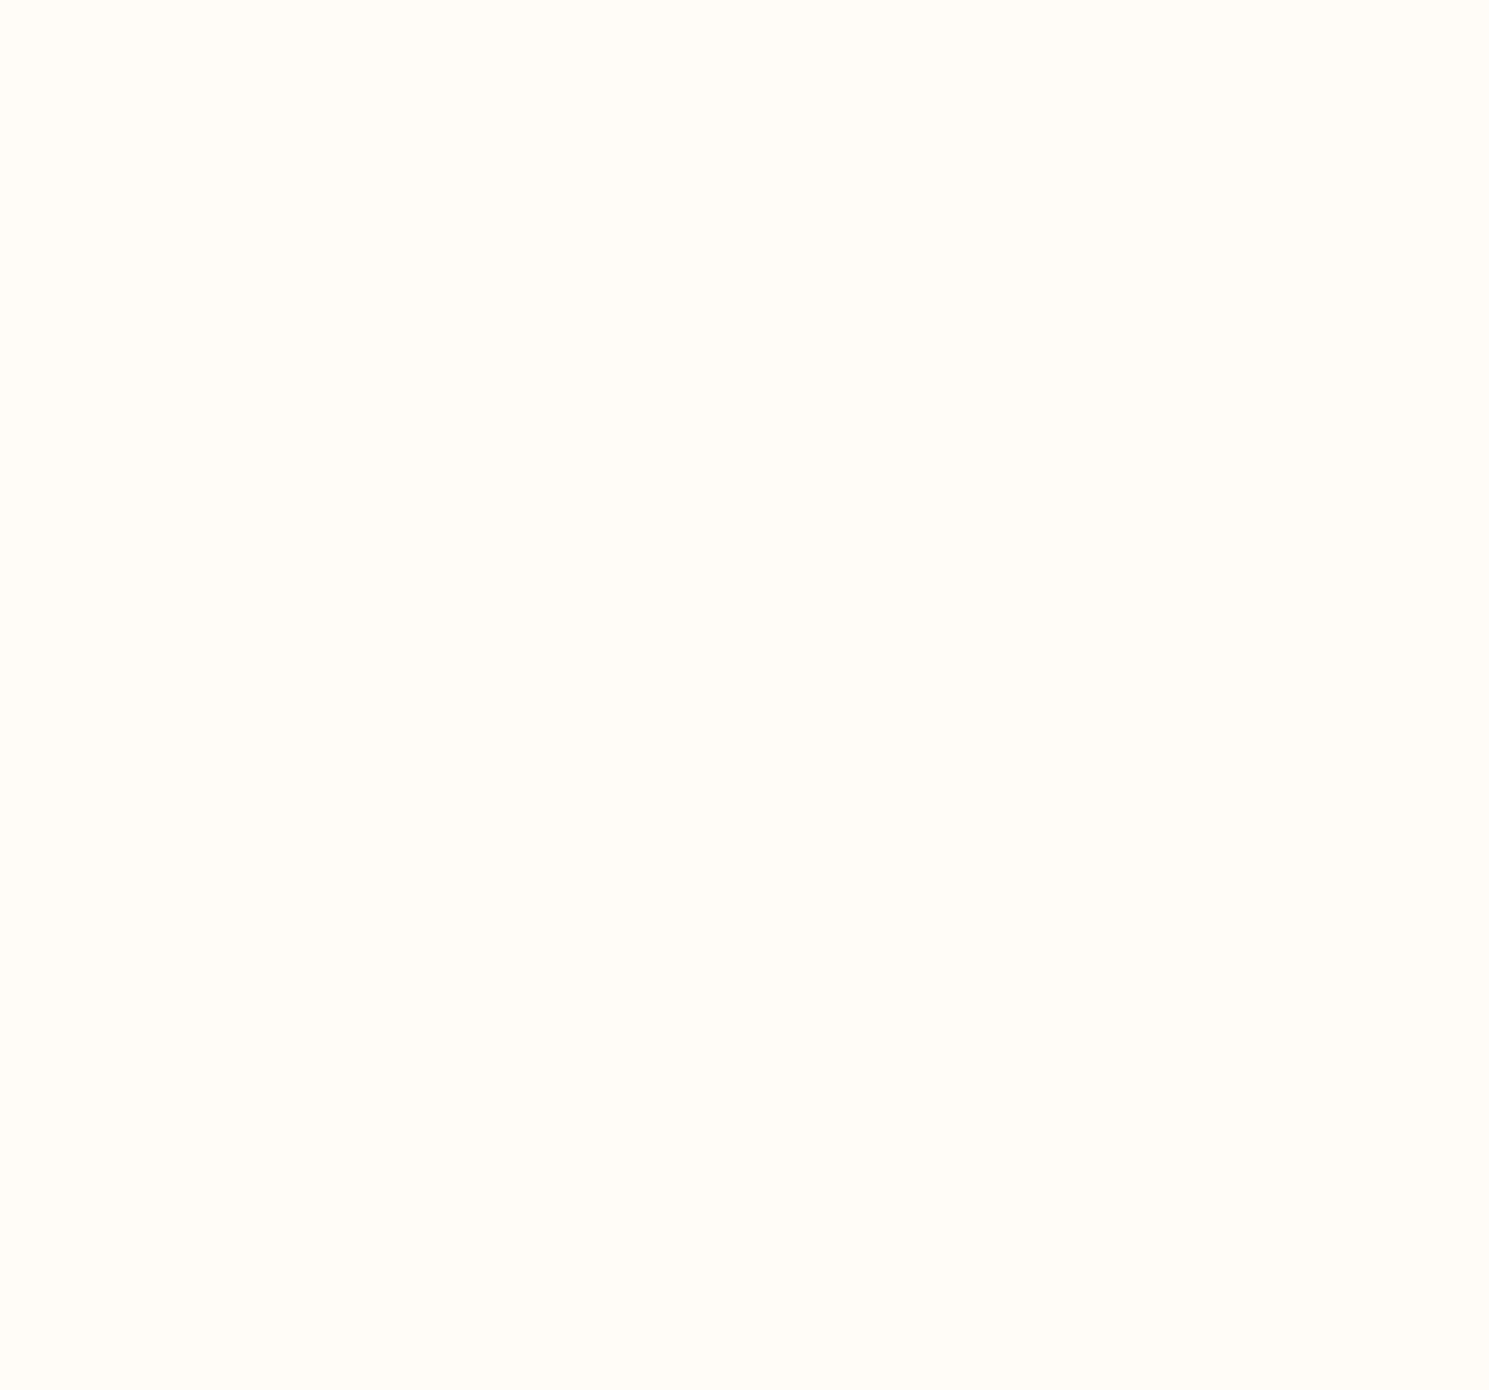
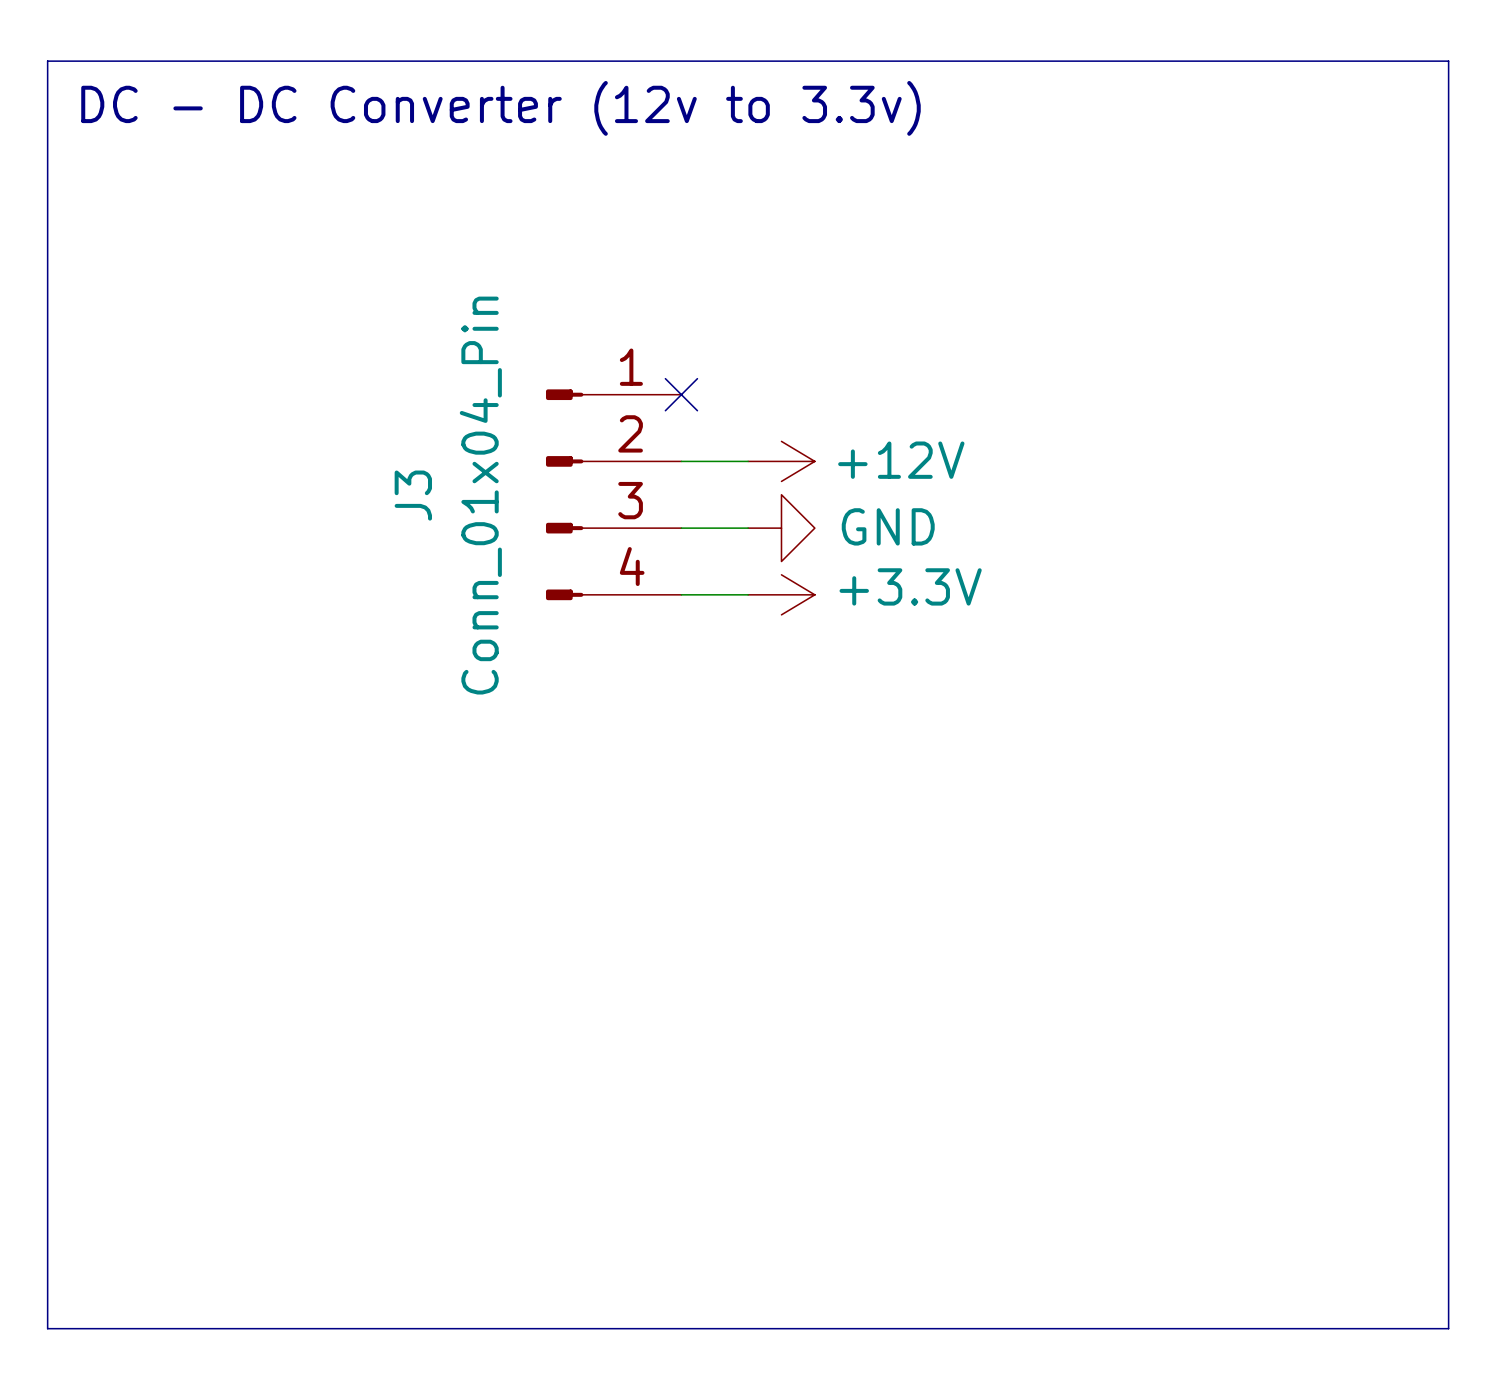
line: none -> (47, 61) (47, 1328) (1448, 1328) (1448, 61) (47, 61)
text: none -> DC - DC Converter (12v to 3.3v) (500, 108)
no-connect mark: none -> (681, 394)
wire: none -> (681, 461) (748, 461)
power symbol: none -> +12V (781, 461)
J3: none -> Conn_01x04_Pin (613, 494)
wire: none -> (681, 528) (748, 528)
power symbol: none -> GND (781, 528)
wire: none -> (681, 594) (748, 594)
power symbol: none -> +3.3V (781, 594)

